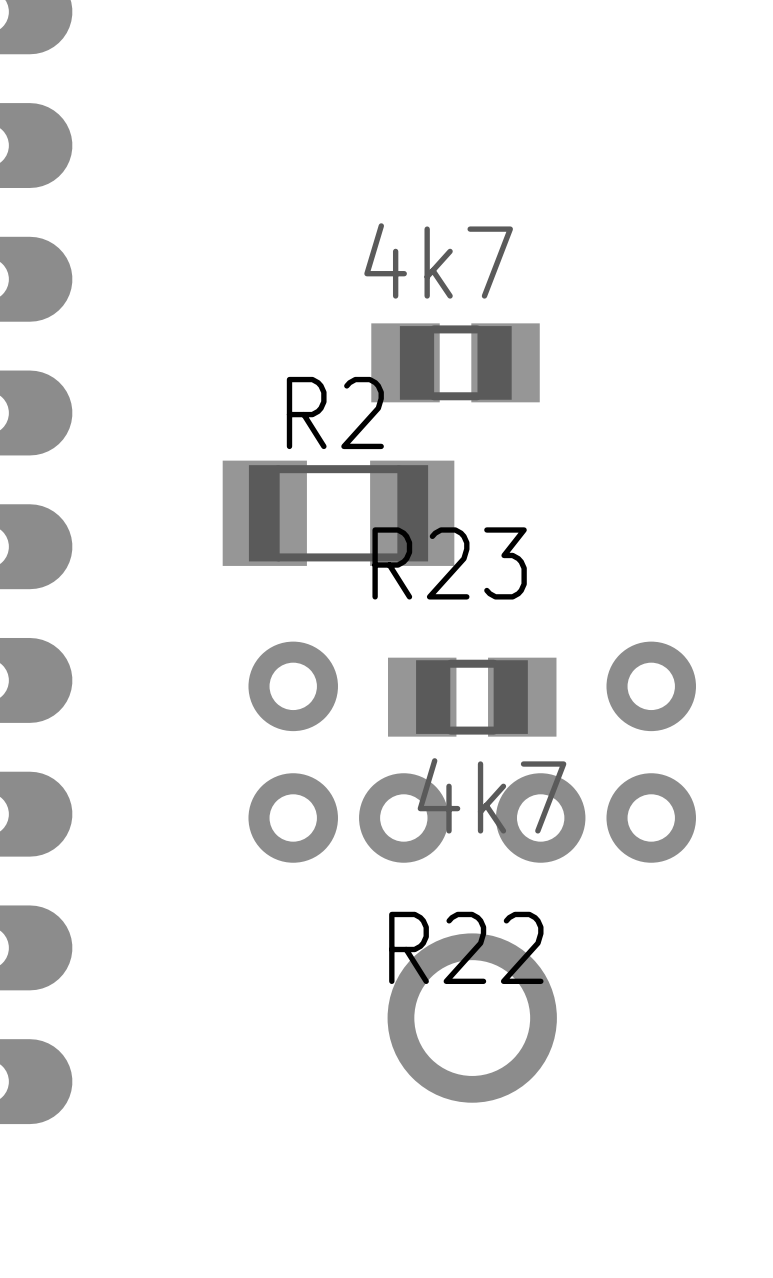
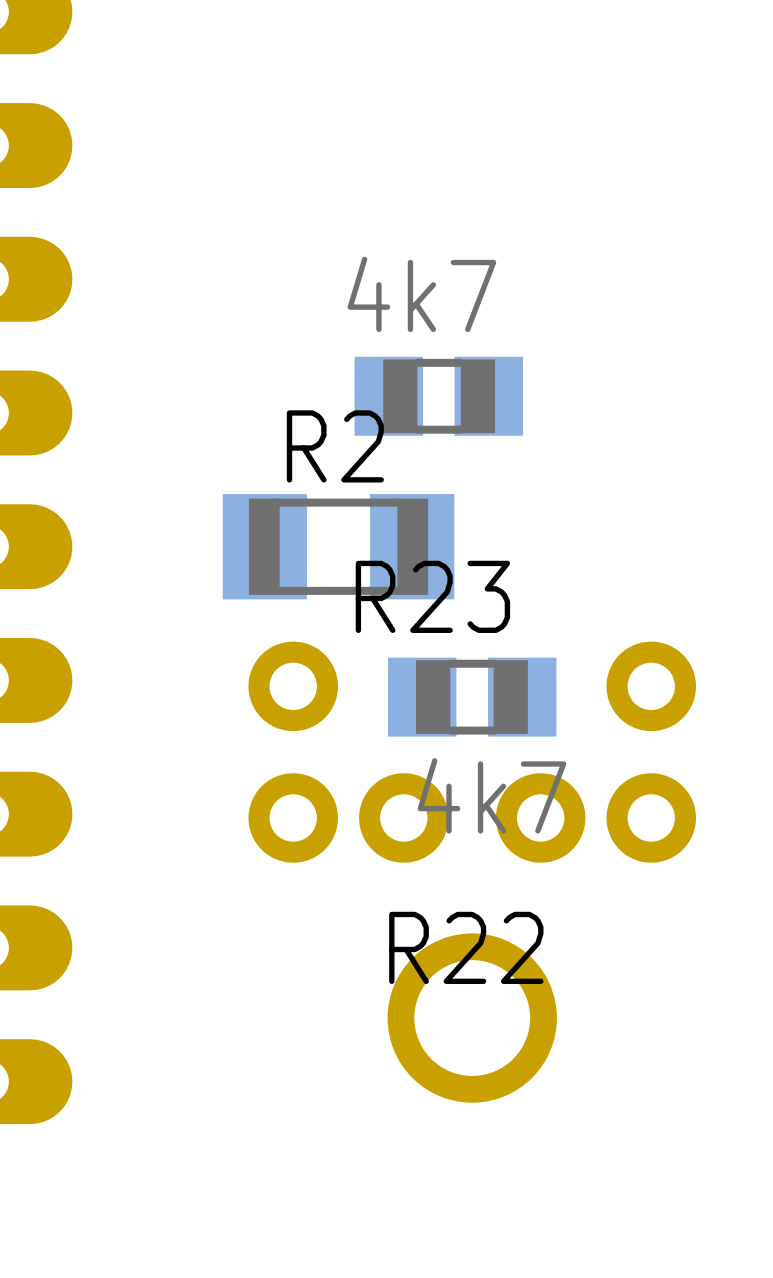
R23 position: (455, 362) -> (438, 396)
R2 position: (338, 513) -> (338, 546)

